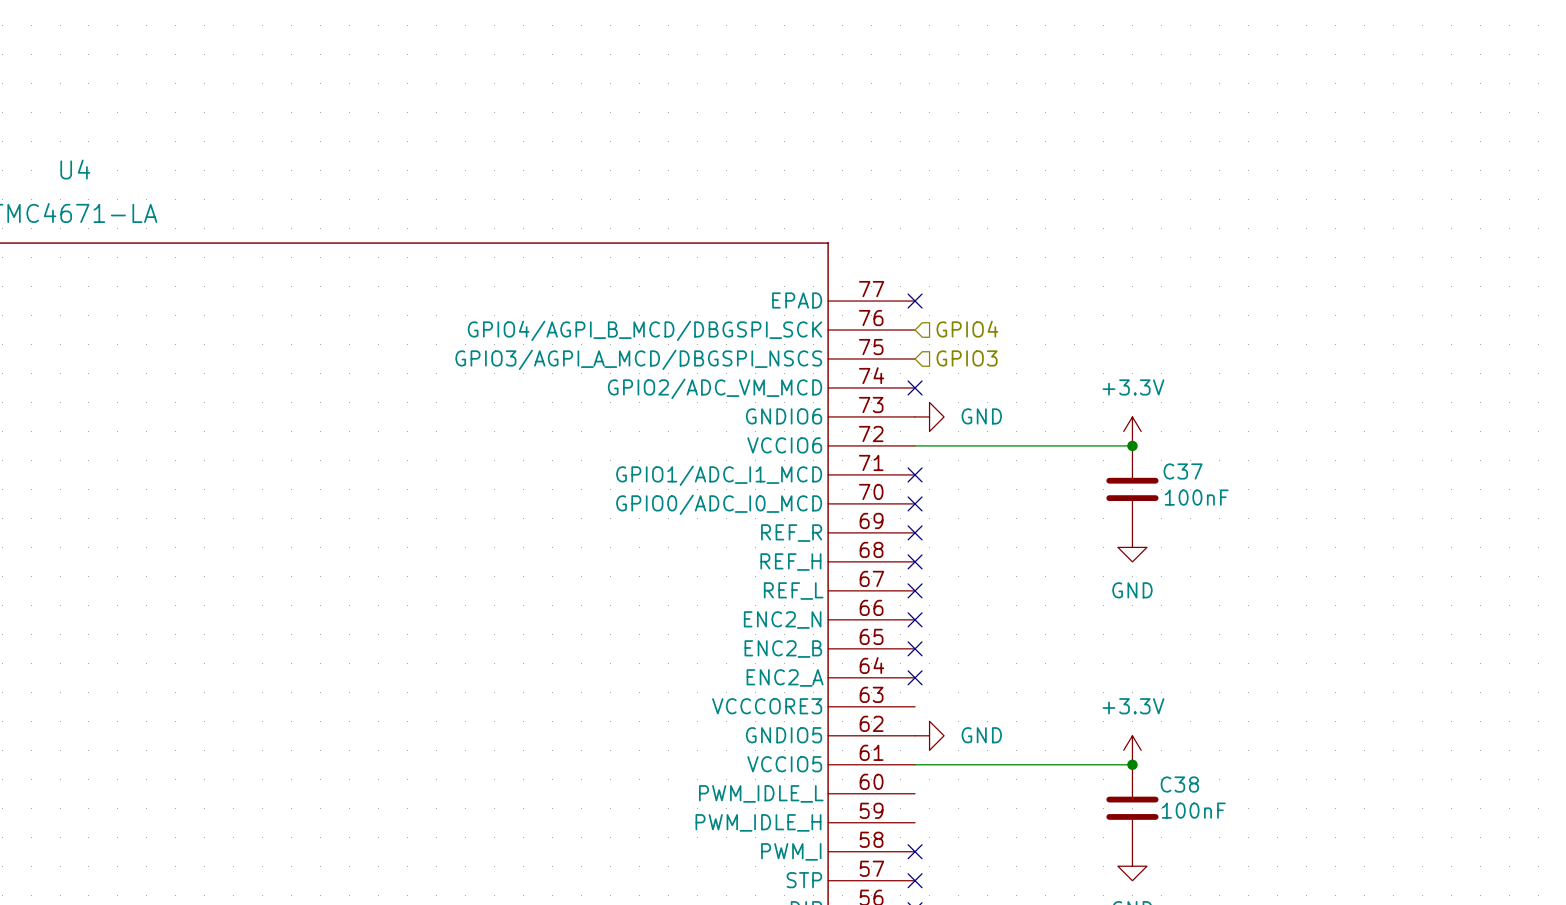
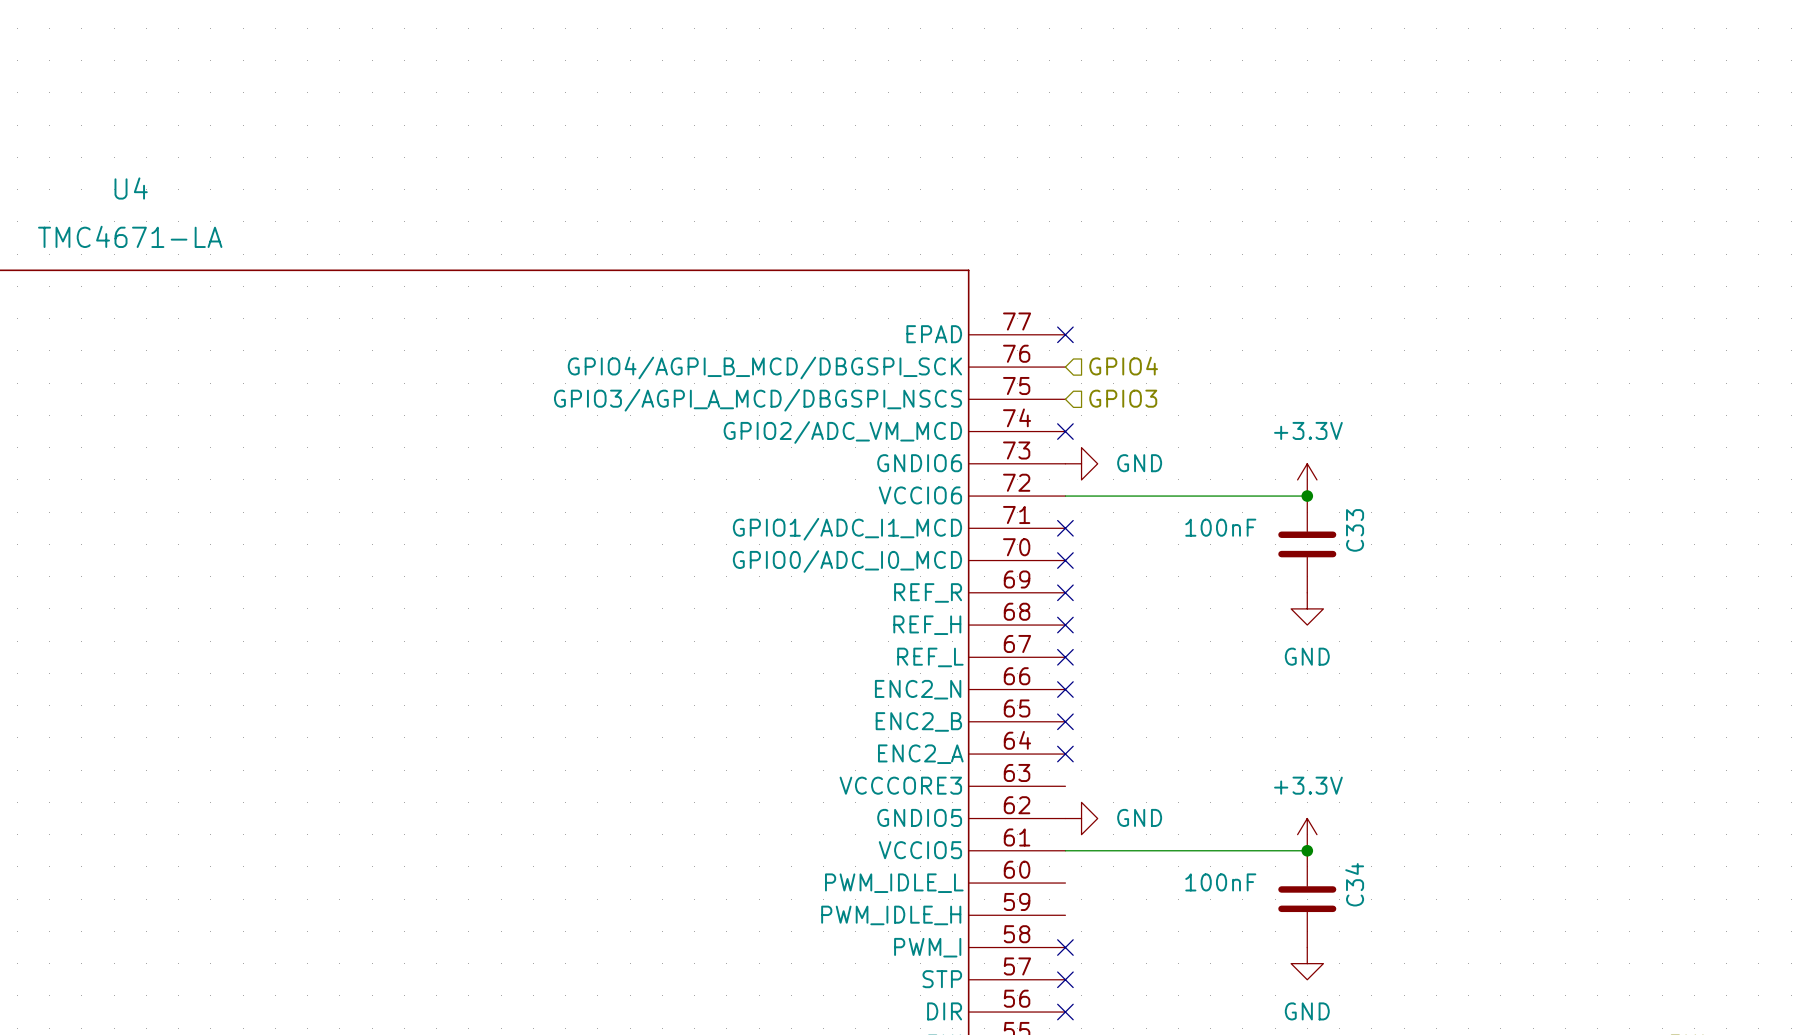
C37 name: C37 (1183, 471) -> C33 (1355, 530)
C37 value position: 100nF (1196, 497) -> 100nF (1220, 527)
C38 name: C38 (1179, 784) -> C34 (1354, 884)
C38 value position: 100nF (1193, 810) -> 100nF (1220, 882)

